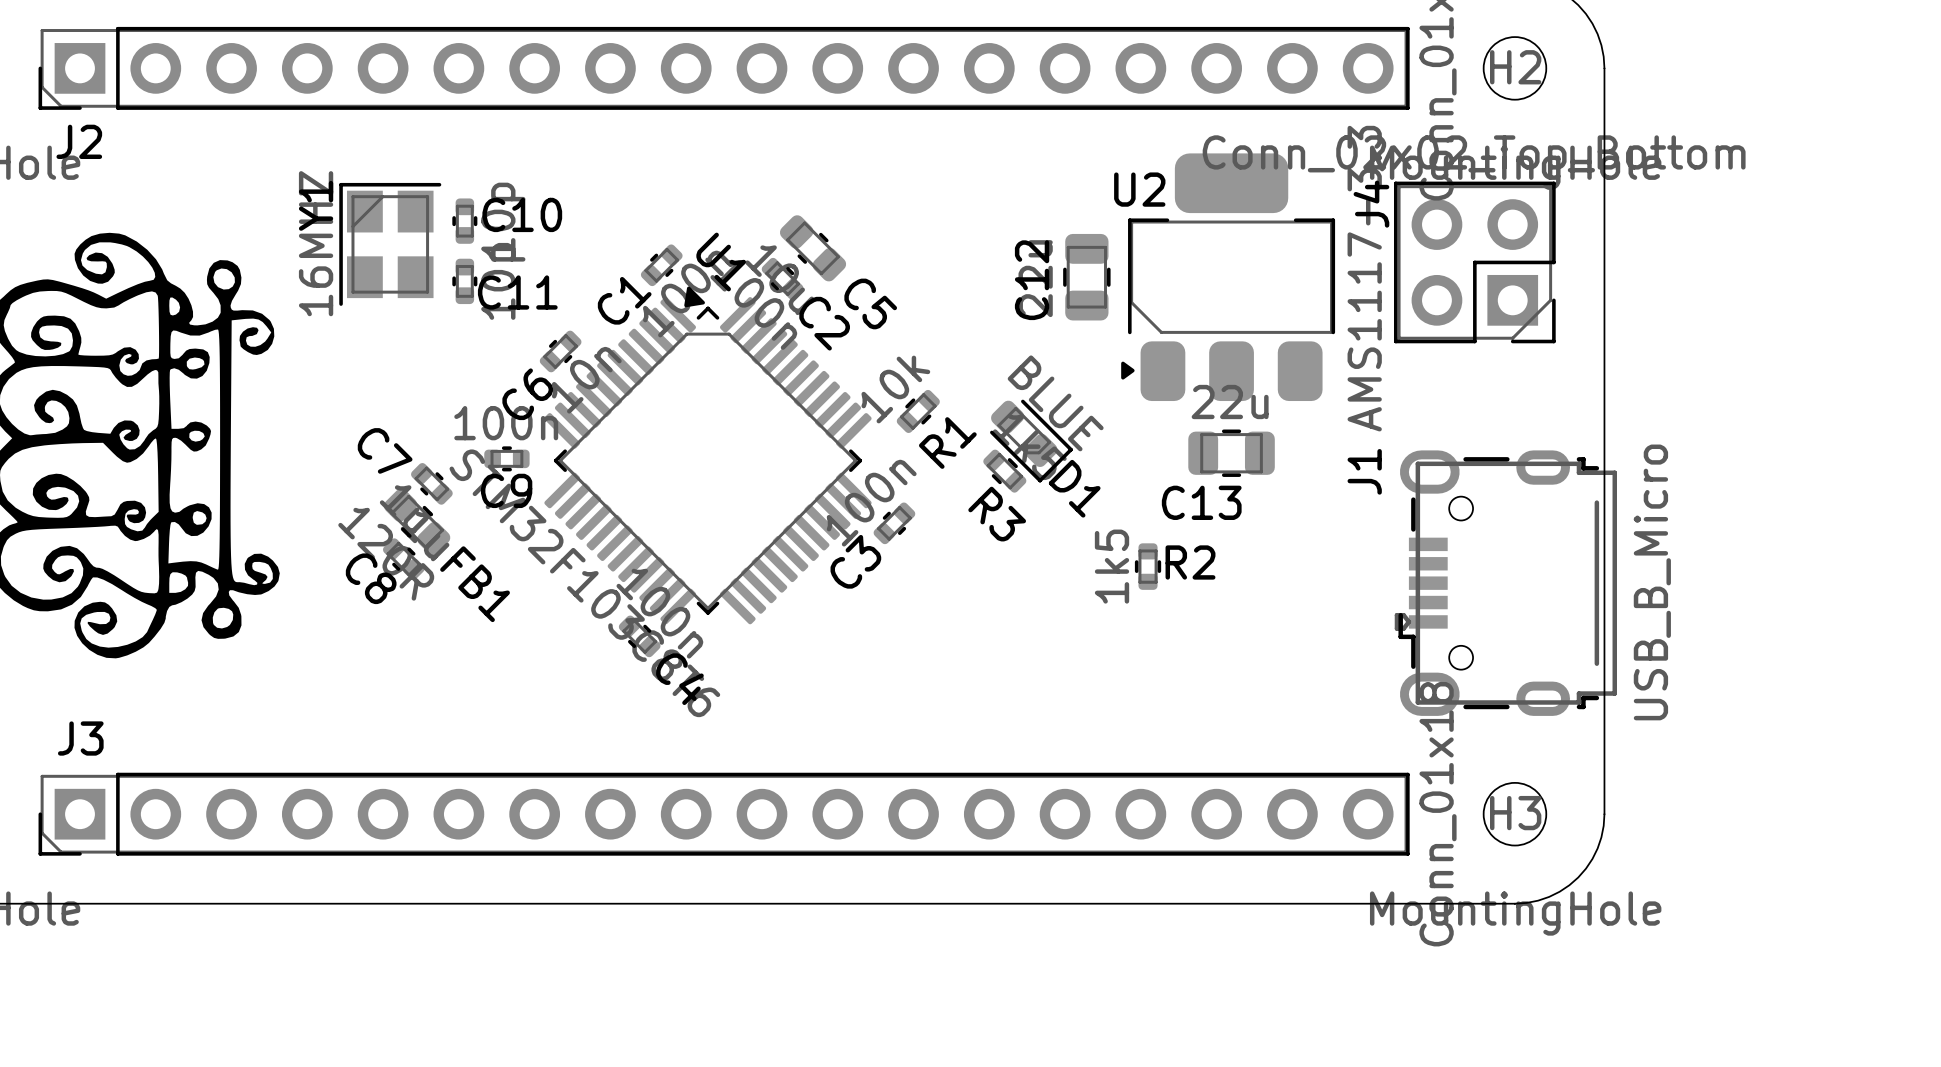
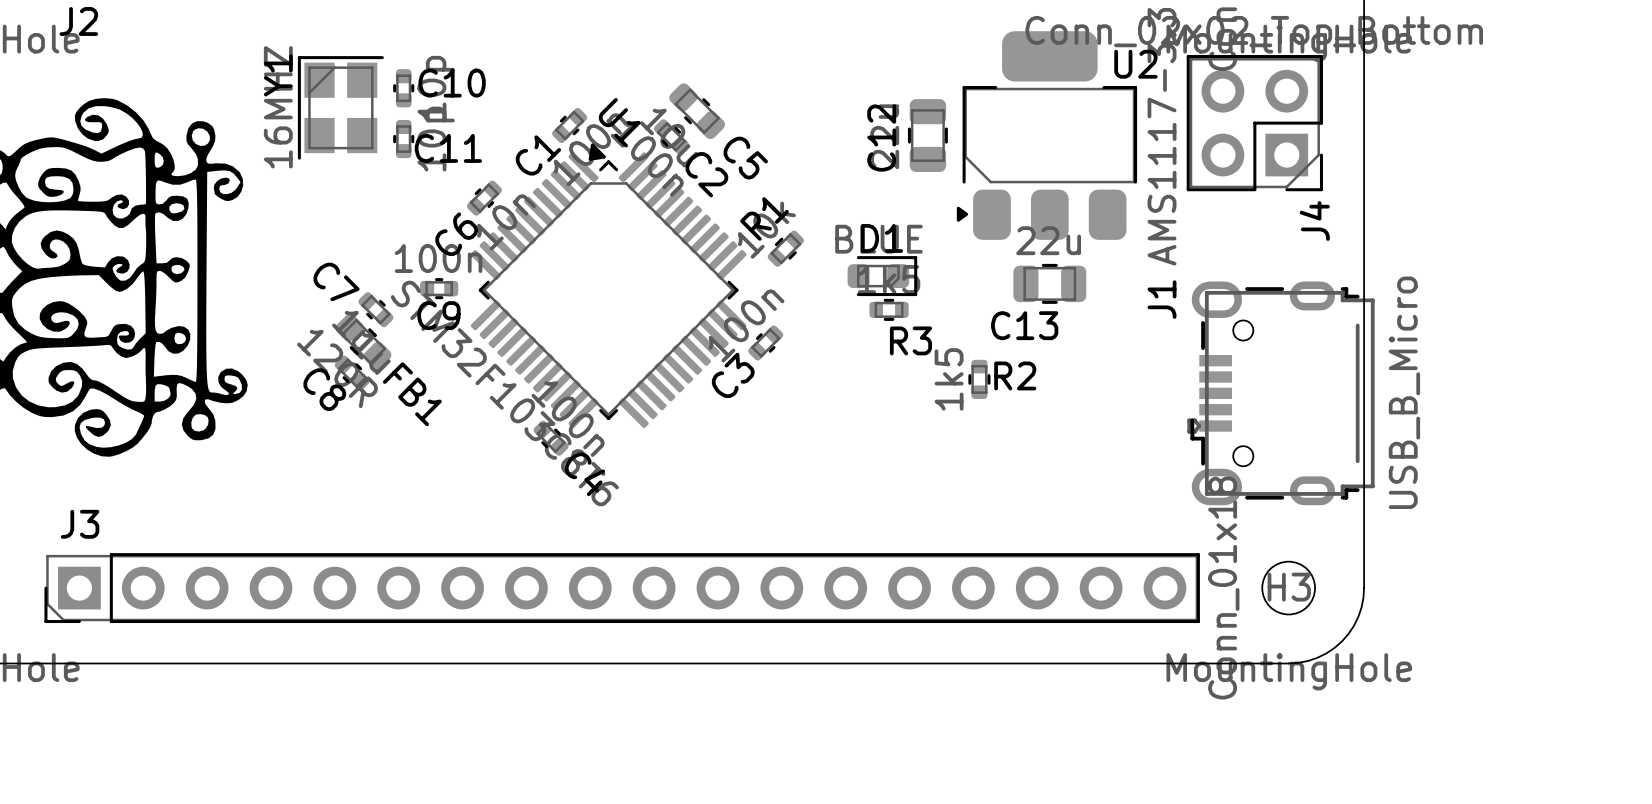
U2 name position: U2 (1139, 189) -> U2 (1135, 64)
J4 name position: J4 (1371, 204) -> J4 (1314, 221)
D1 rotation: 0° (1031, 441) -> 45° counterclockwise (882, 276)
R1 name position: R1 (947, 443) -> R1 (764, 218)
R3 rotation: 0° (1004, 471) -> 45° counterclockwise (889, 309)
R3 position: (1004, 471) -> (889, 309)
D1 name position: D1 (1074, 488) -> D1 (881, 238)

